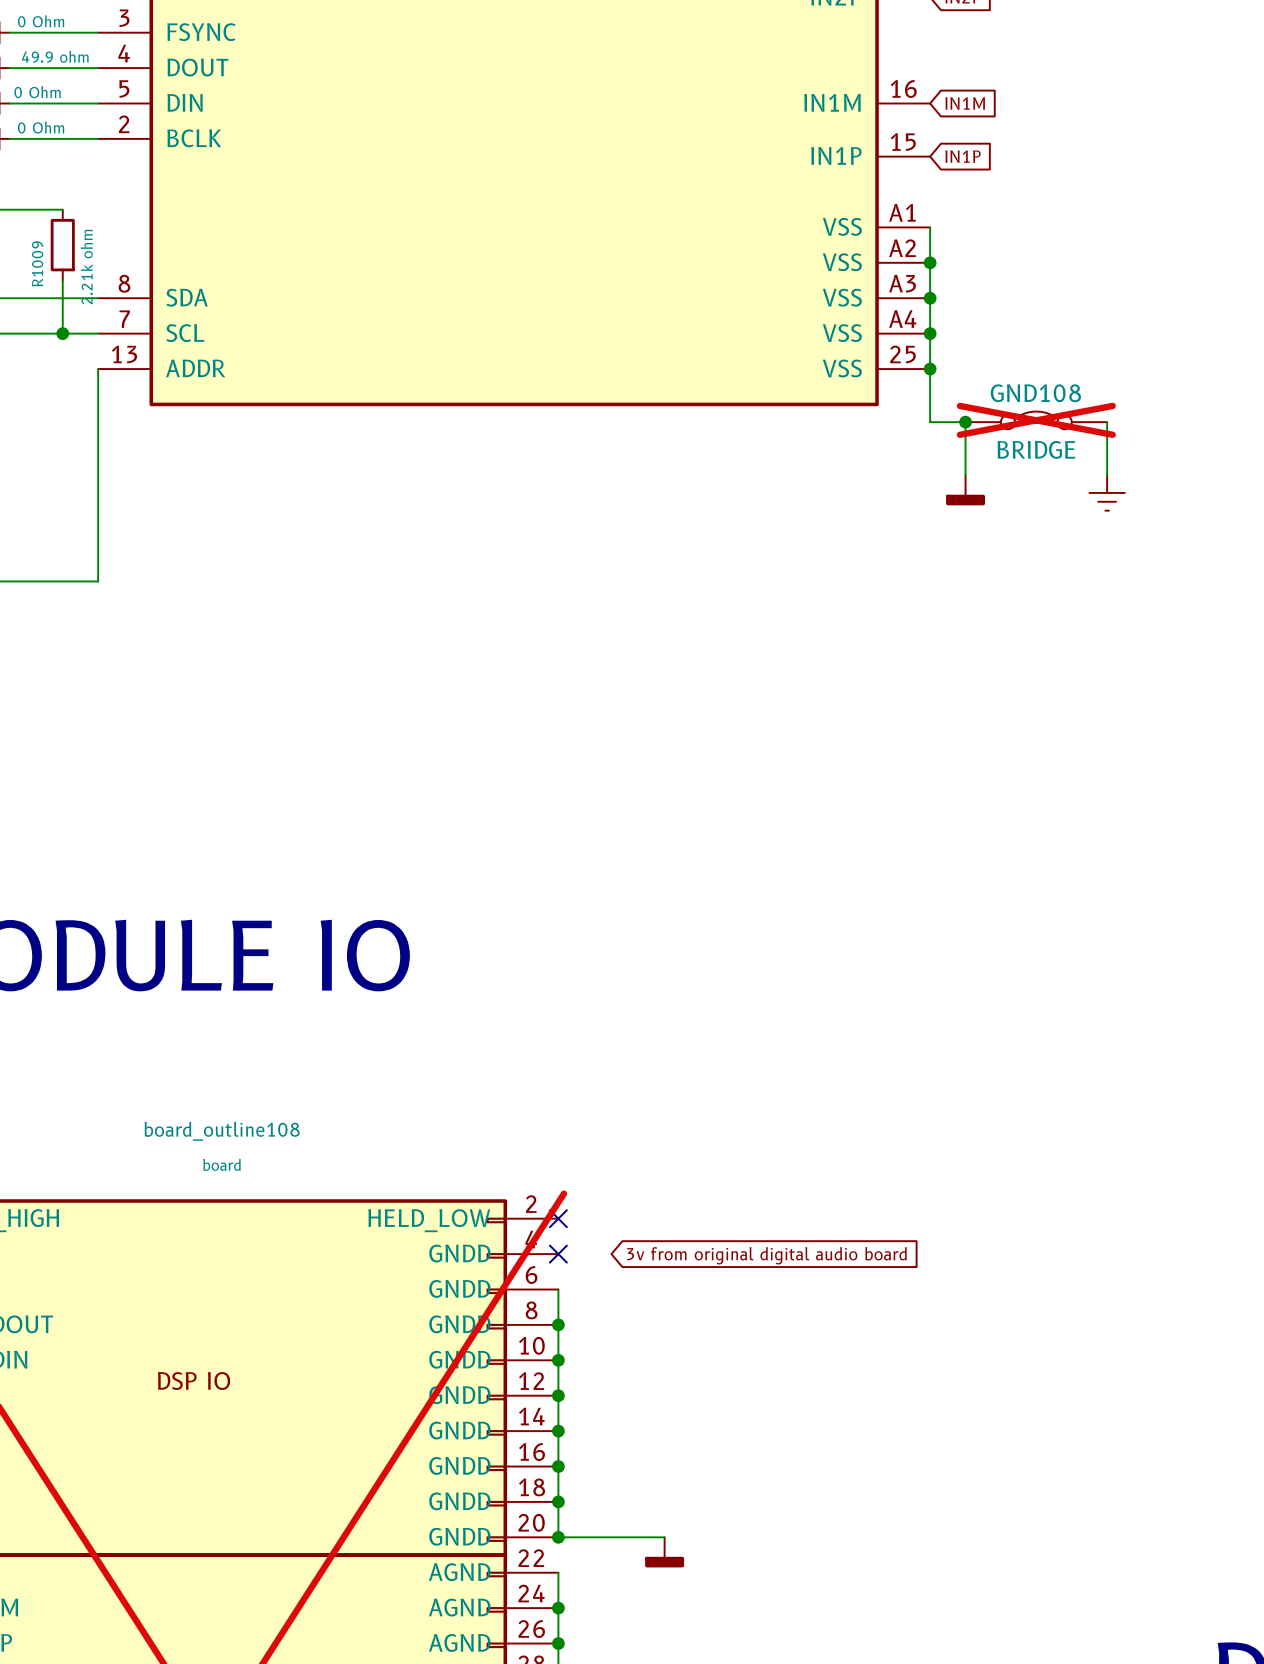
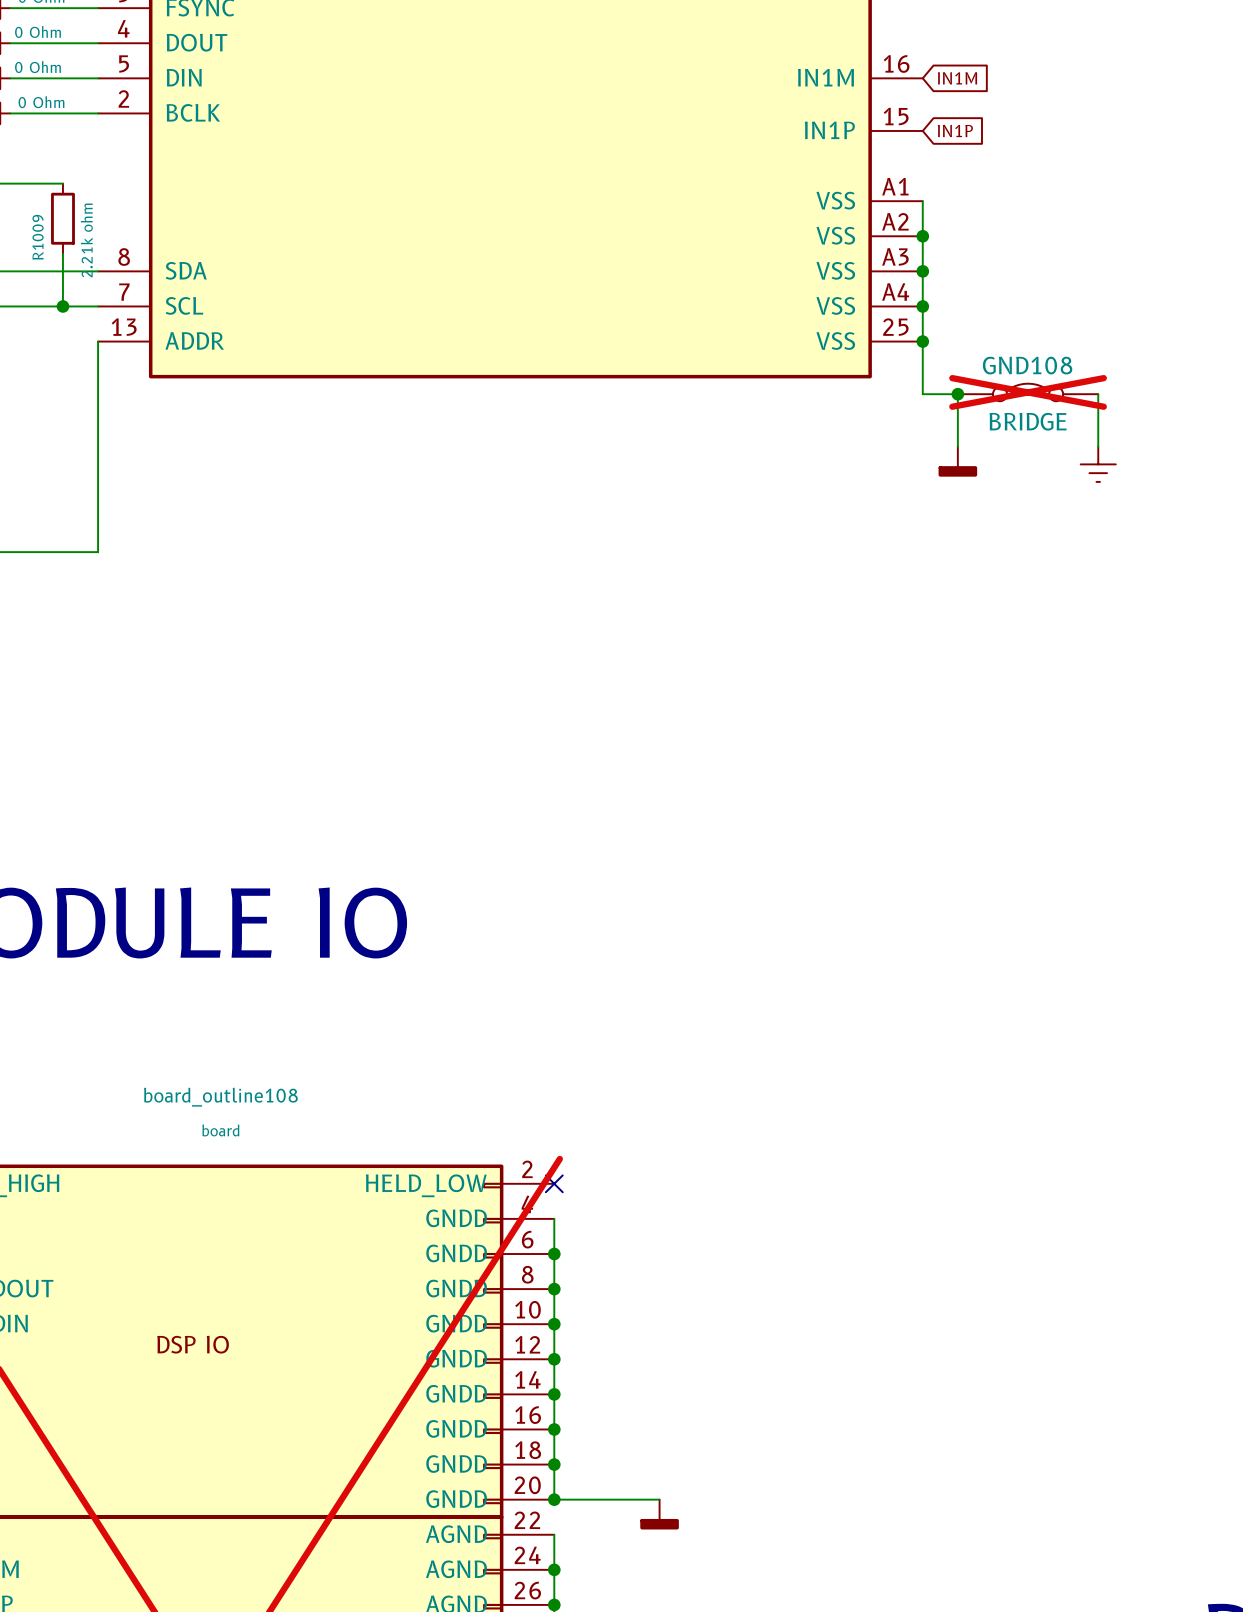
part value: 49.9 ohm (55, 56) -> 0 Ohm (37, 32)
wire: none -> (554, 1218) (554, 1254)
no-connect mark: (558, 1254) -> none
global label: 3v from original digital audio board (766, 1255) -> none
junction: none -> (554, 1254)

